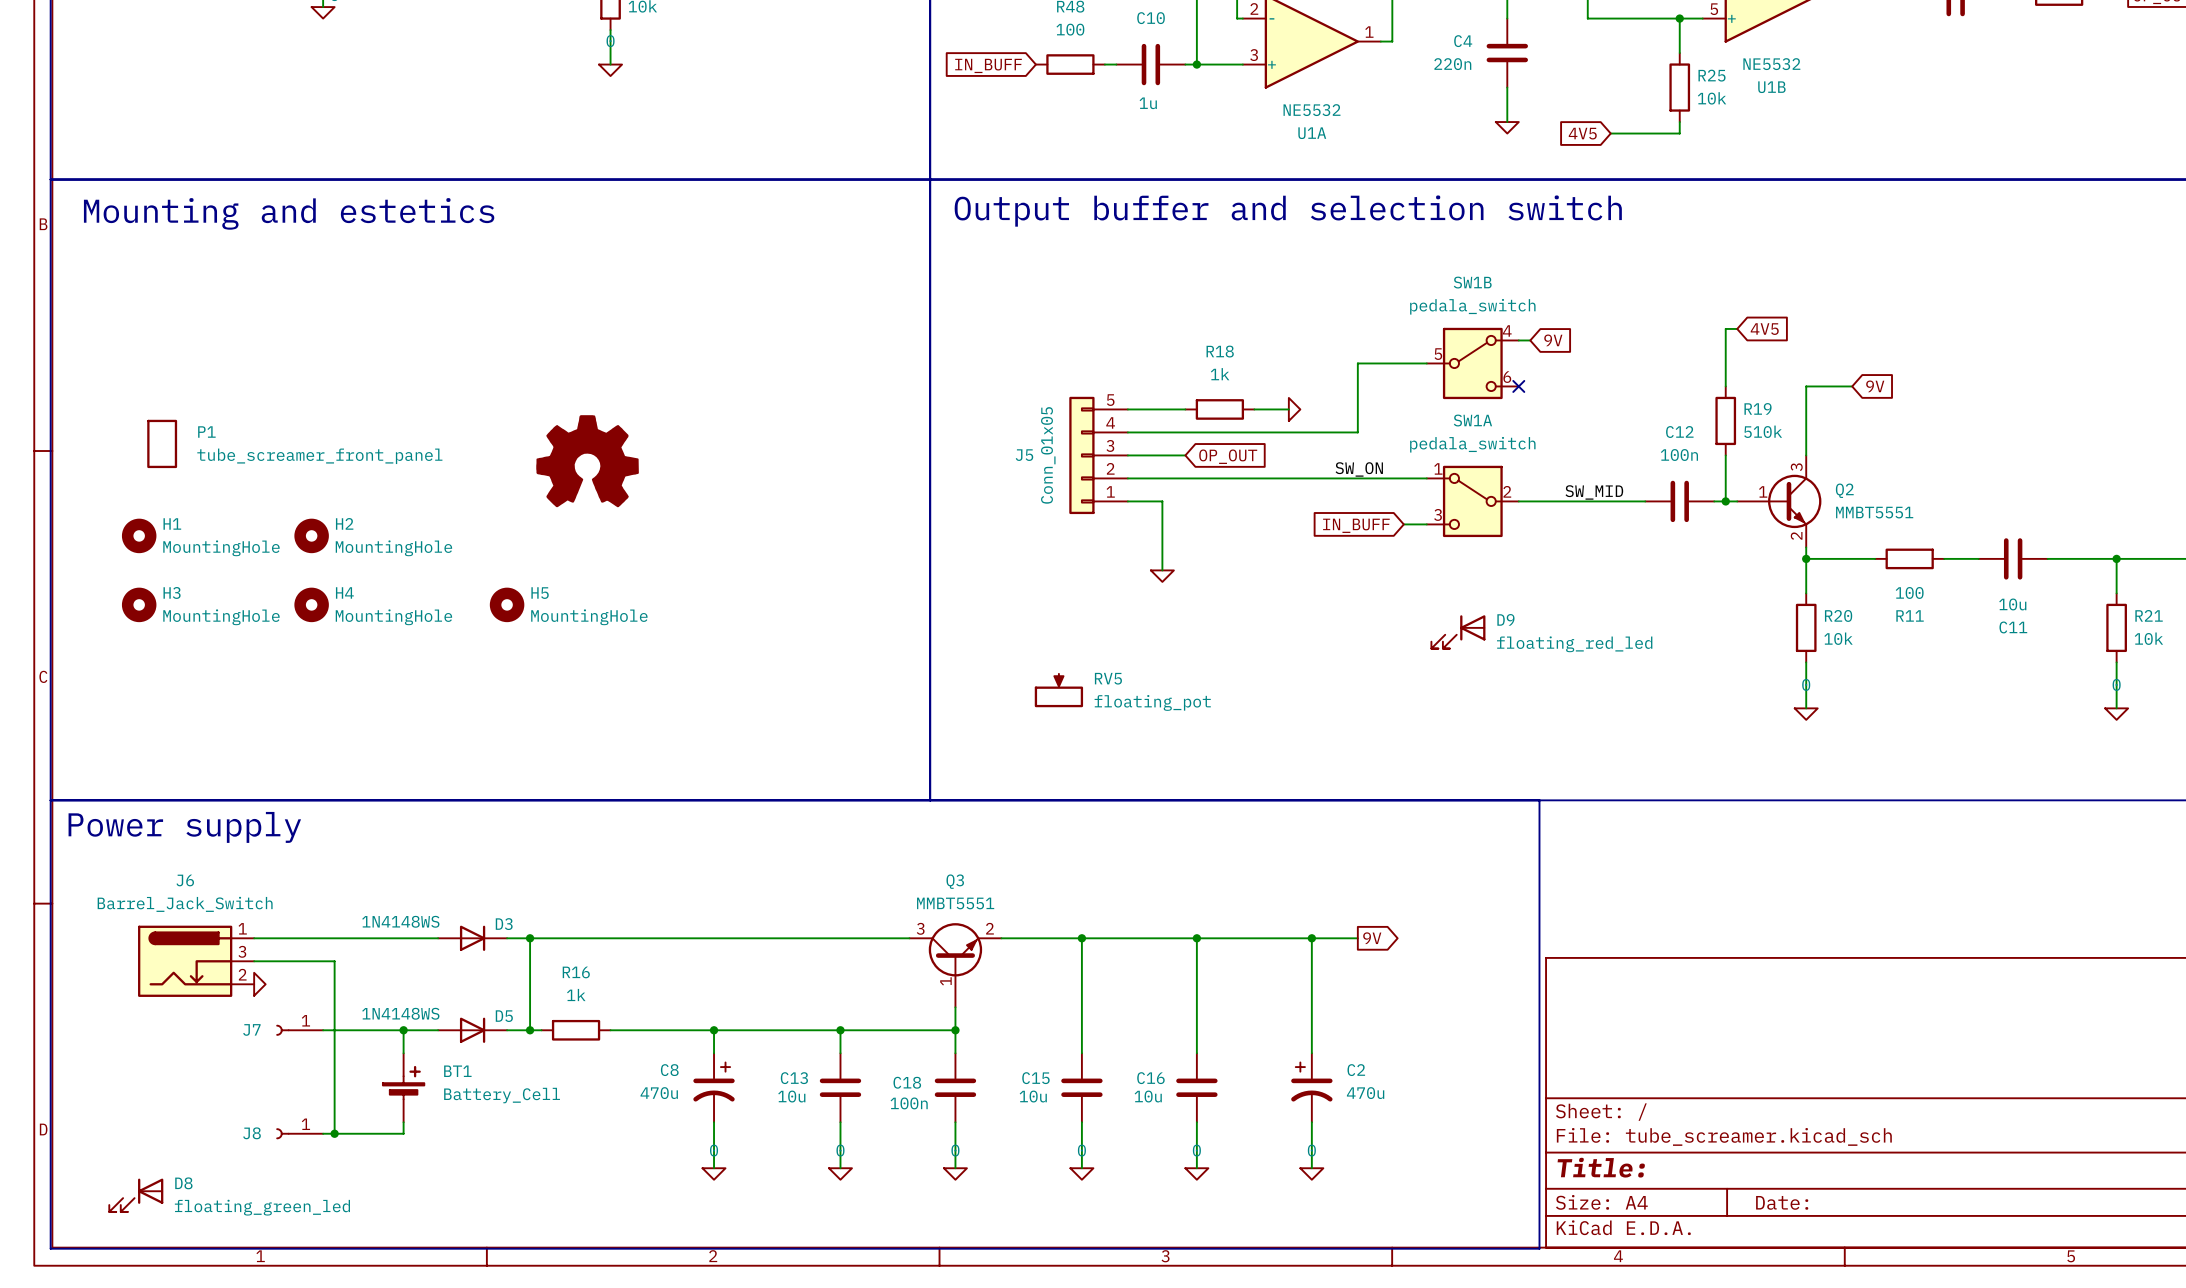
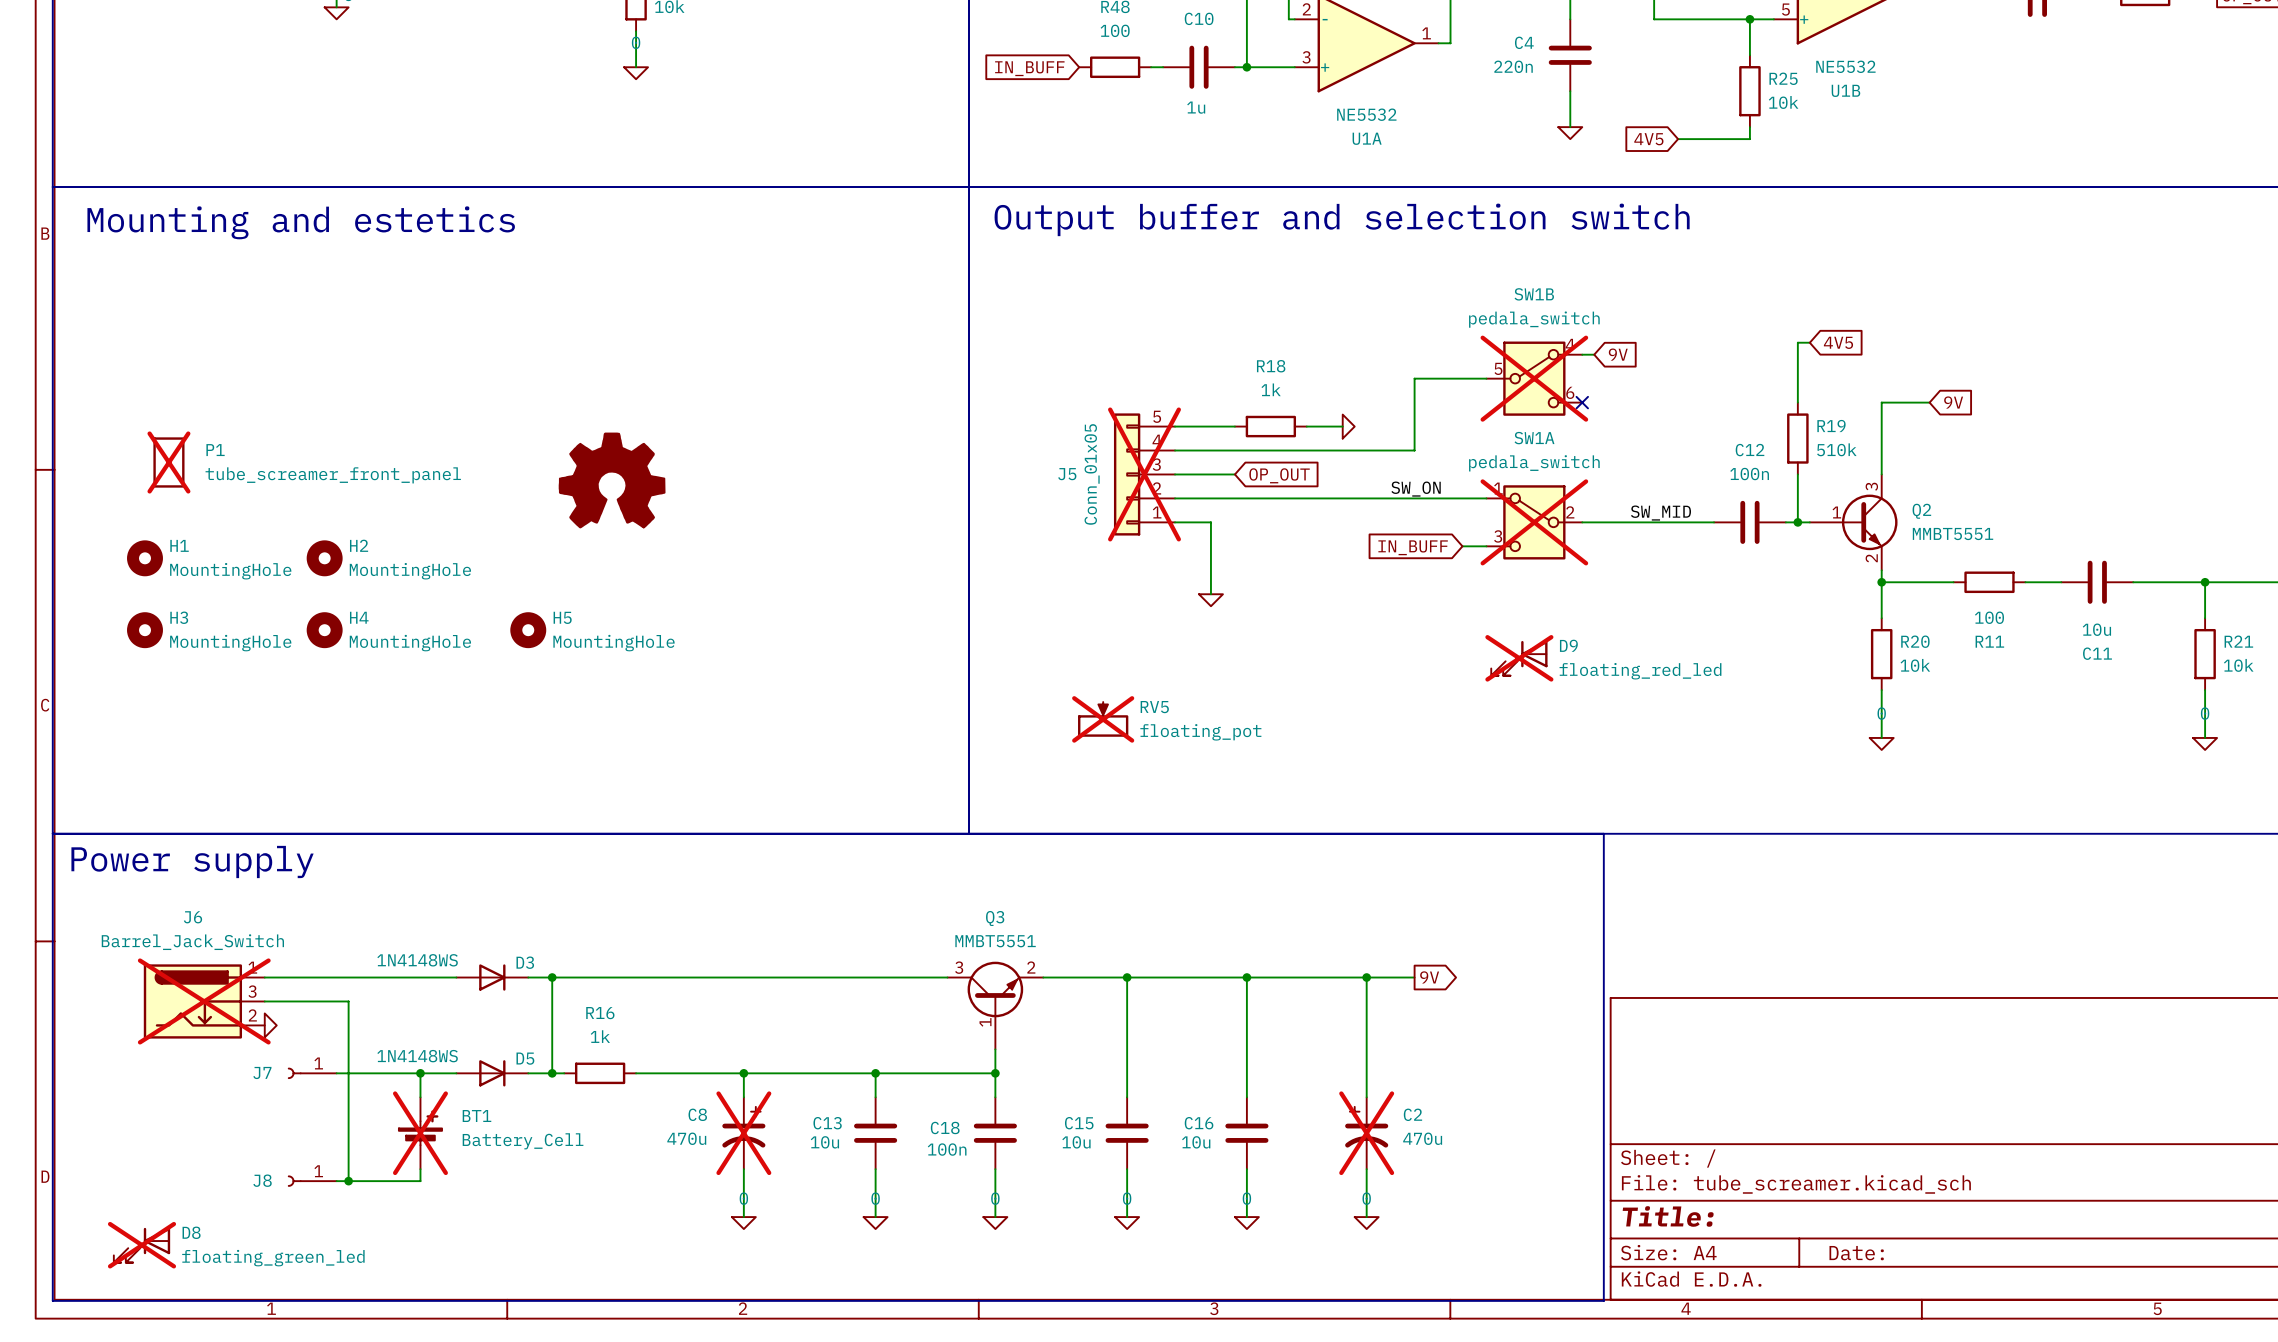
SW1B do-not-place cross: none -> (1534, 378)
P1 do-not-place cross: none -> (168, 462)
J5 do-not-place cross: none -> (1144, 474)
SW1A do-not-place cross: none -> (1534, 522)
D9 do-not-place cross: none -> (1519, 658)
RV5 do-not-place cross: none -> (1103, 719)
J6 do-not-place cross: none -> (204, 1001)
BT1 do-not-place cross: none -> (420, 1133)
C8 do-not-place cross: none -> (743, 1133)
C2 do-not-place cross: none -> (1366, 1133)
D8 do-not-place cross: none -> (142, 1245)

